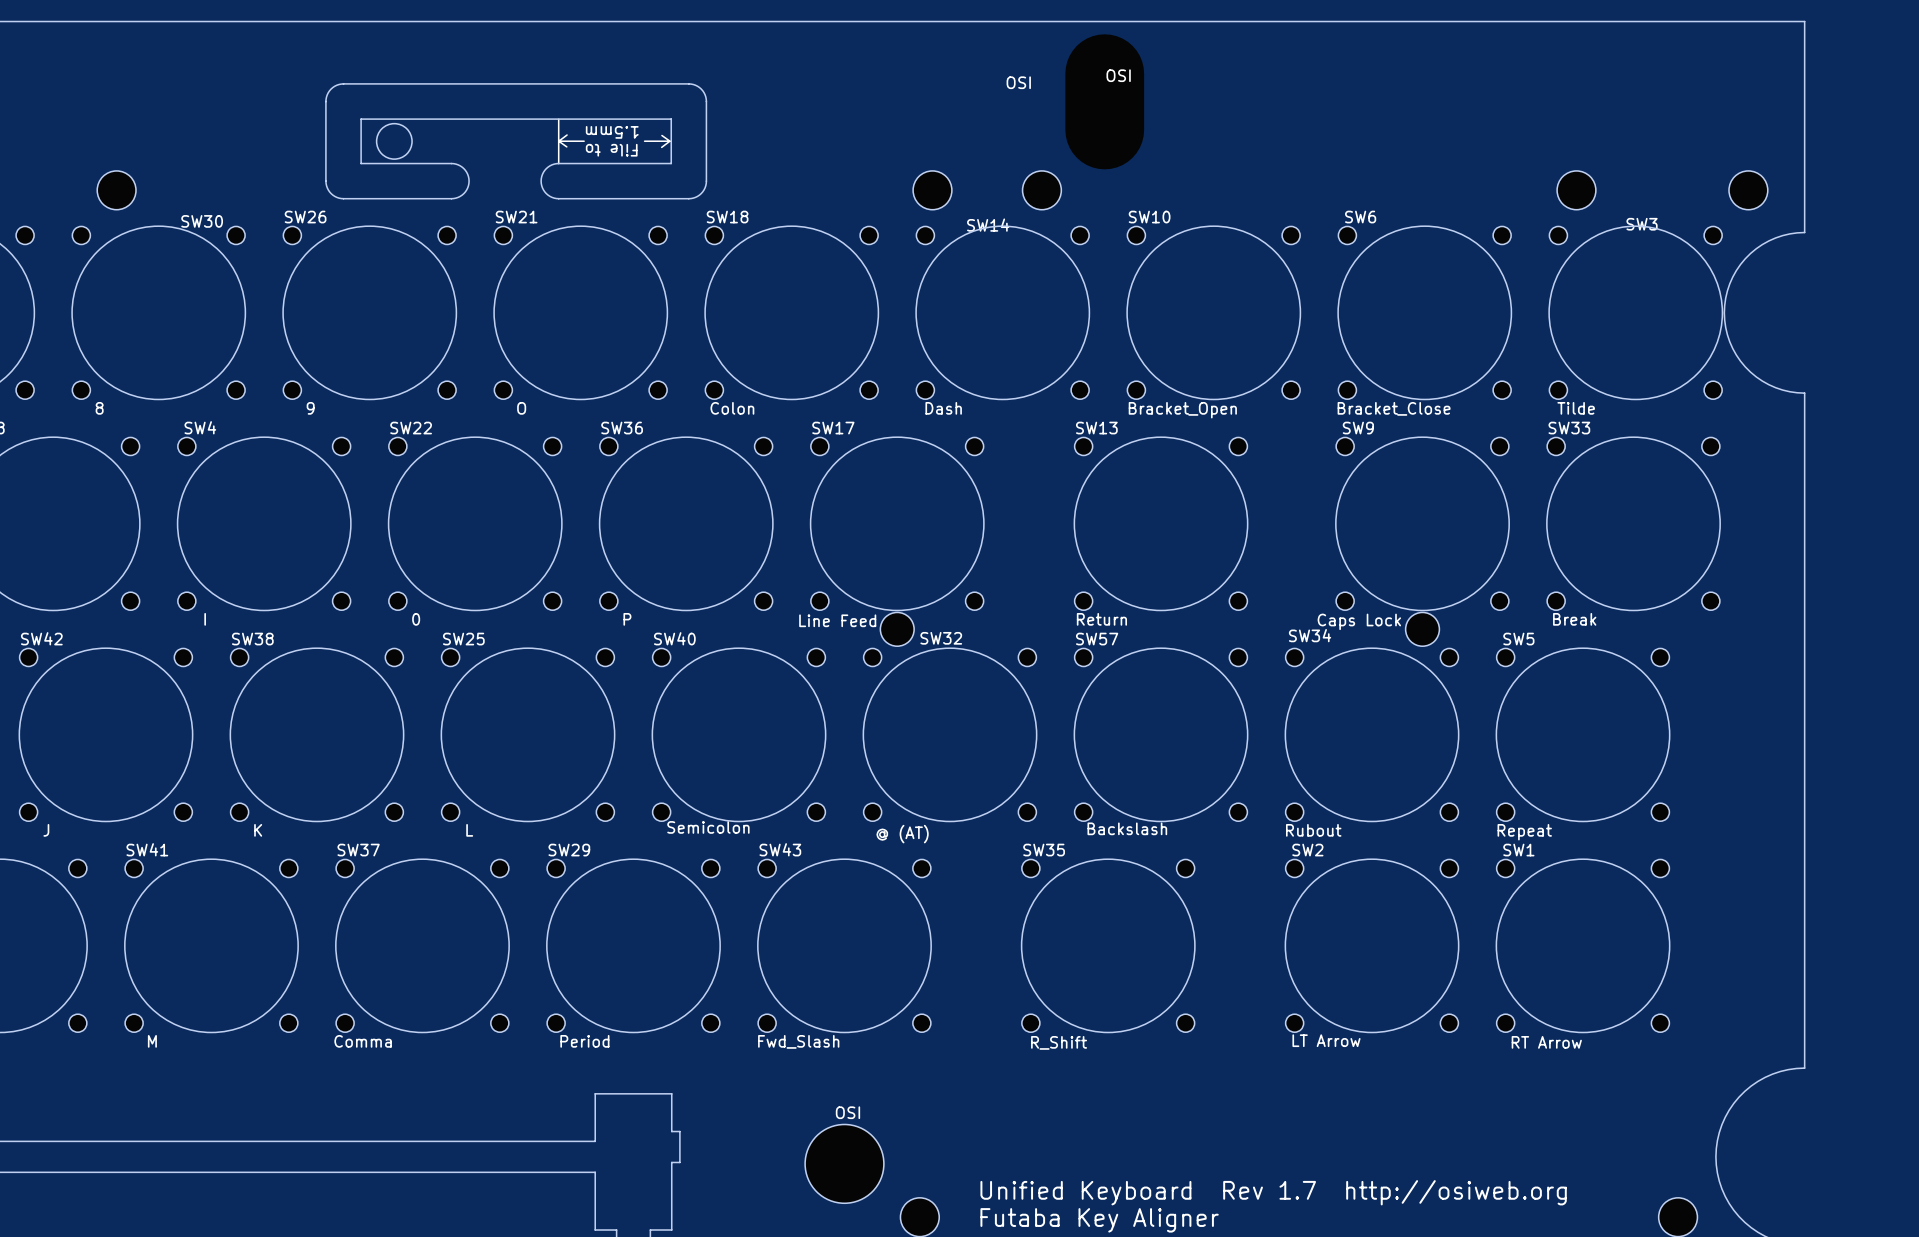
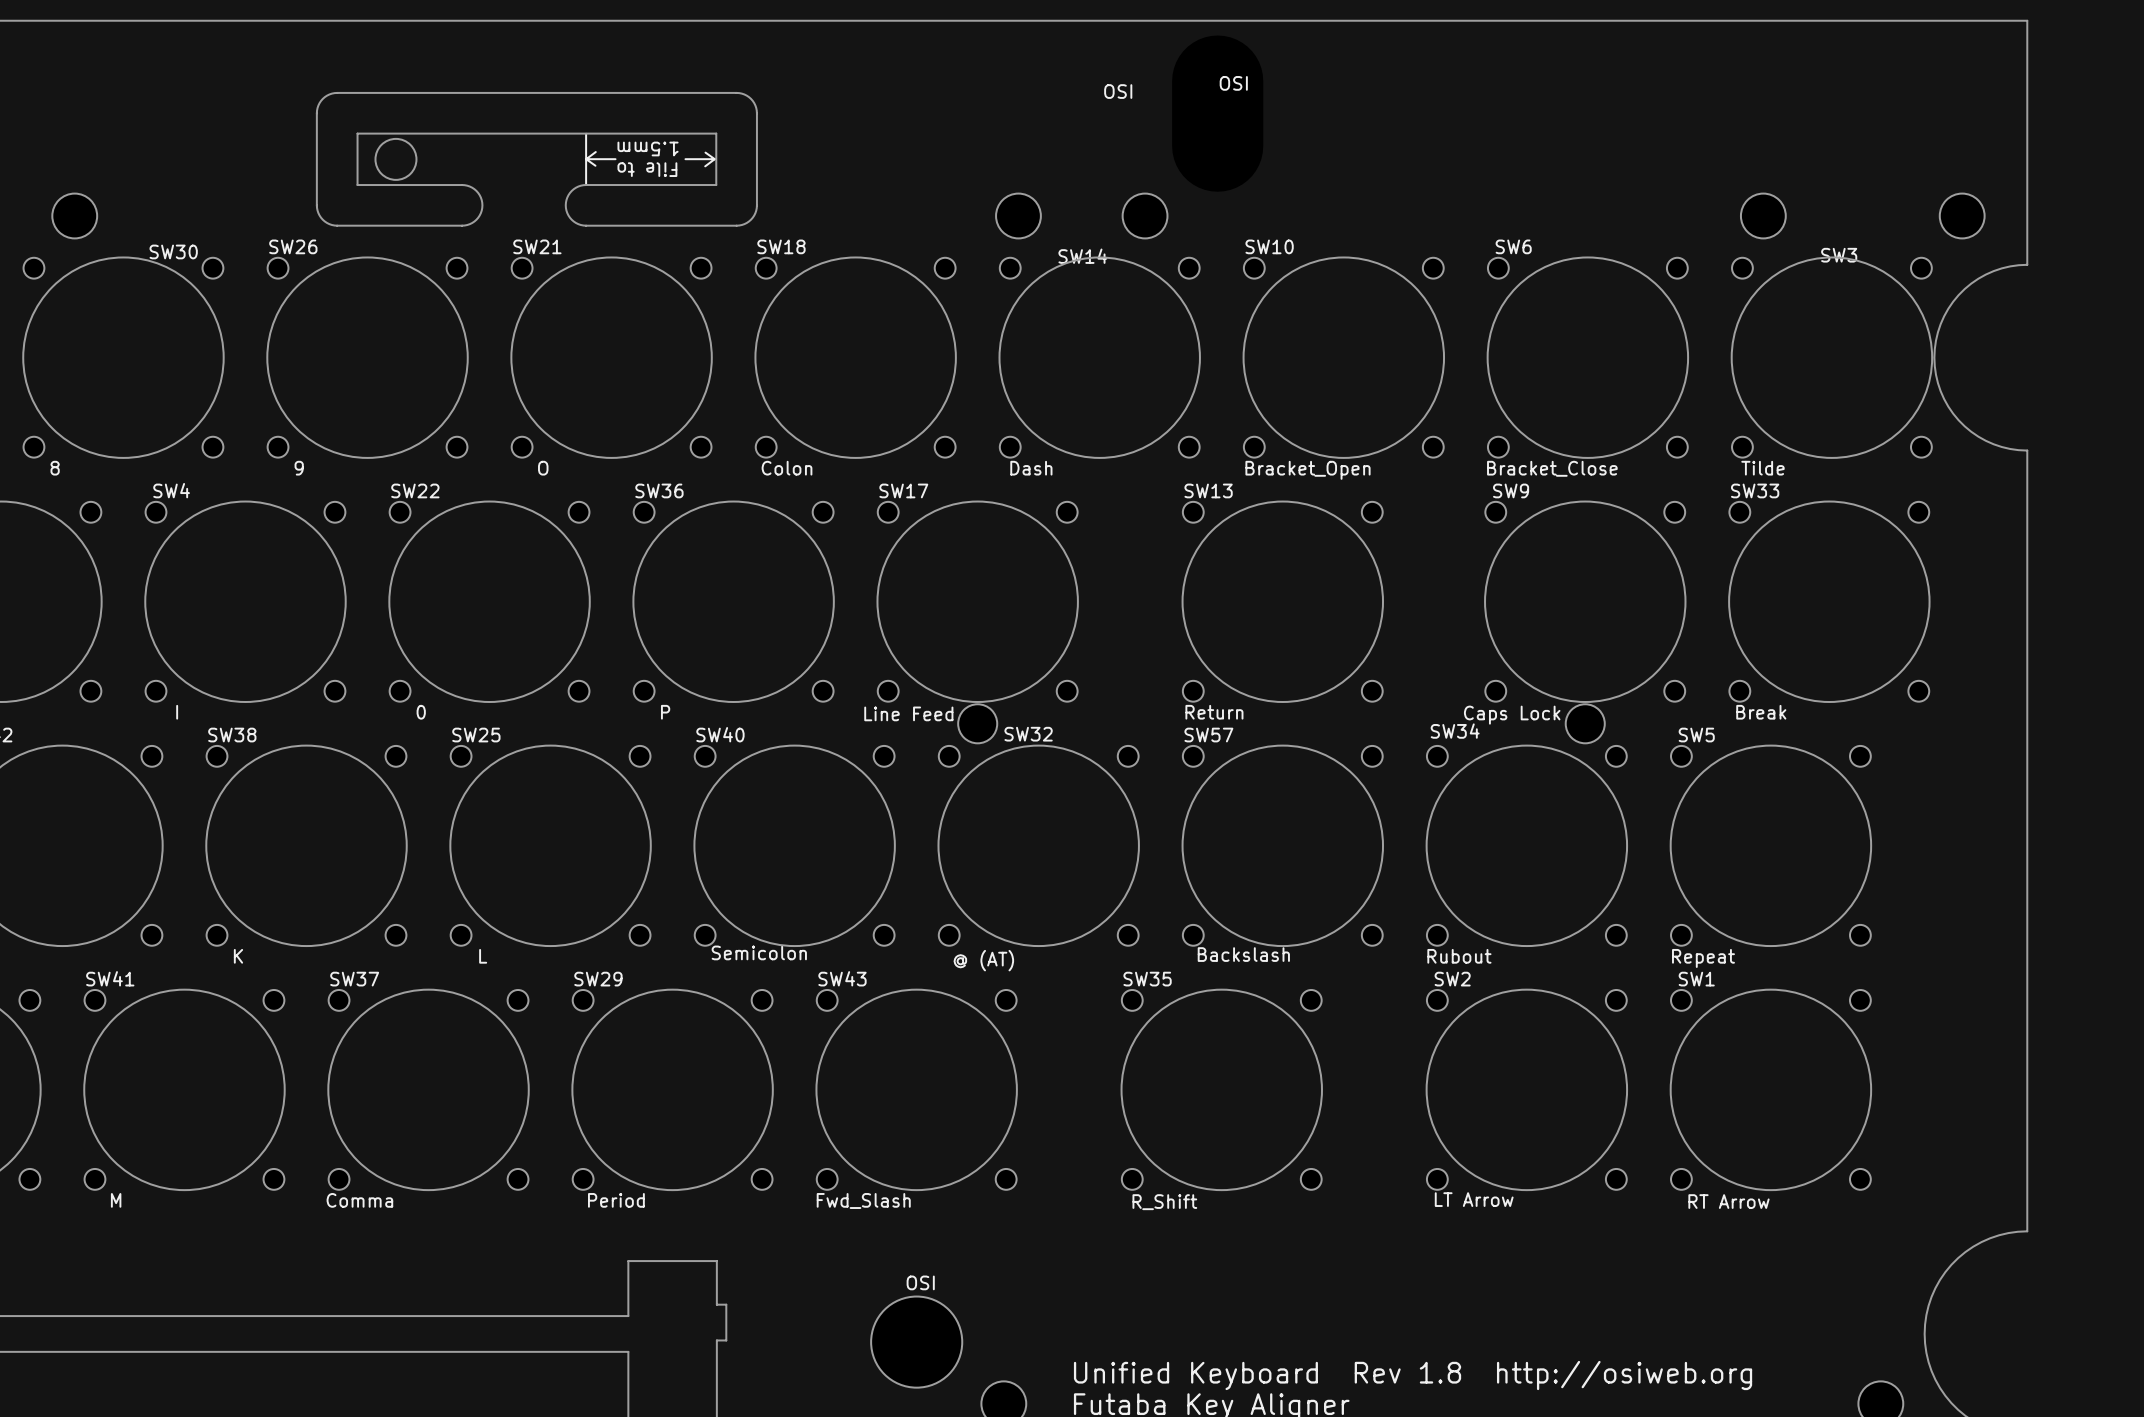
text: Unified Keyboard Rev 1.7 http://osiweb.org (1273, 1192) -> Unified Keyboard Rev 1.8 http://osiweb.org (1413, 1375)

